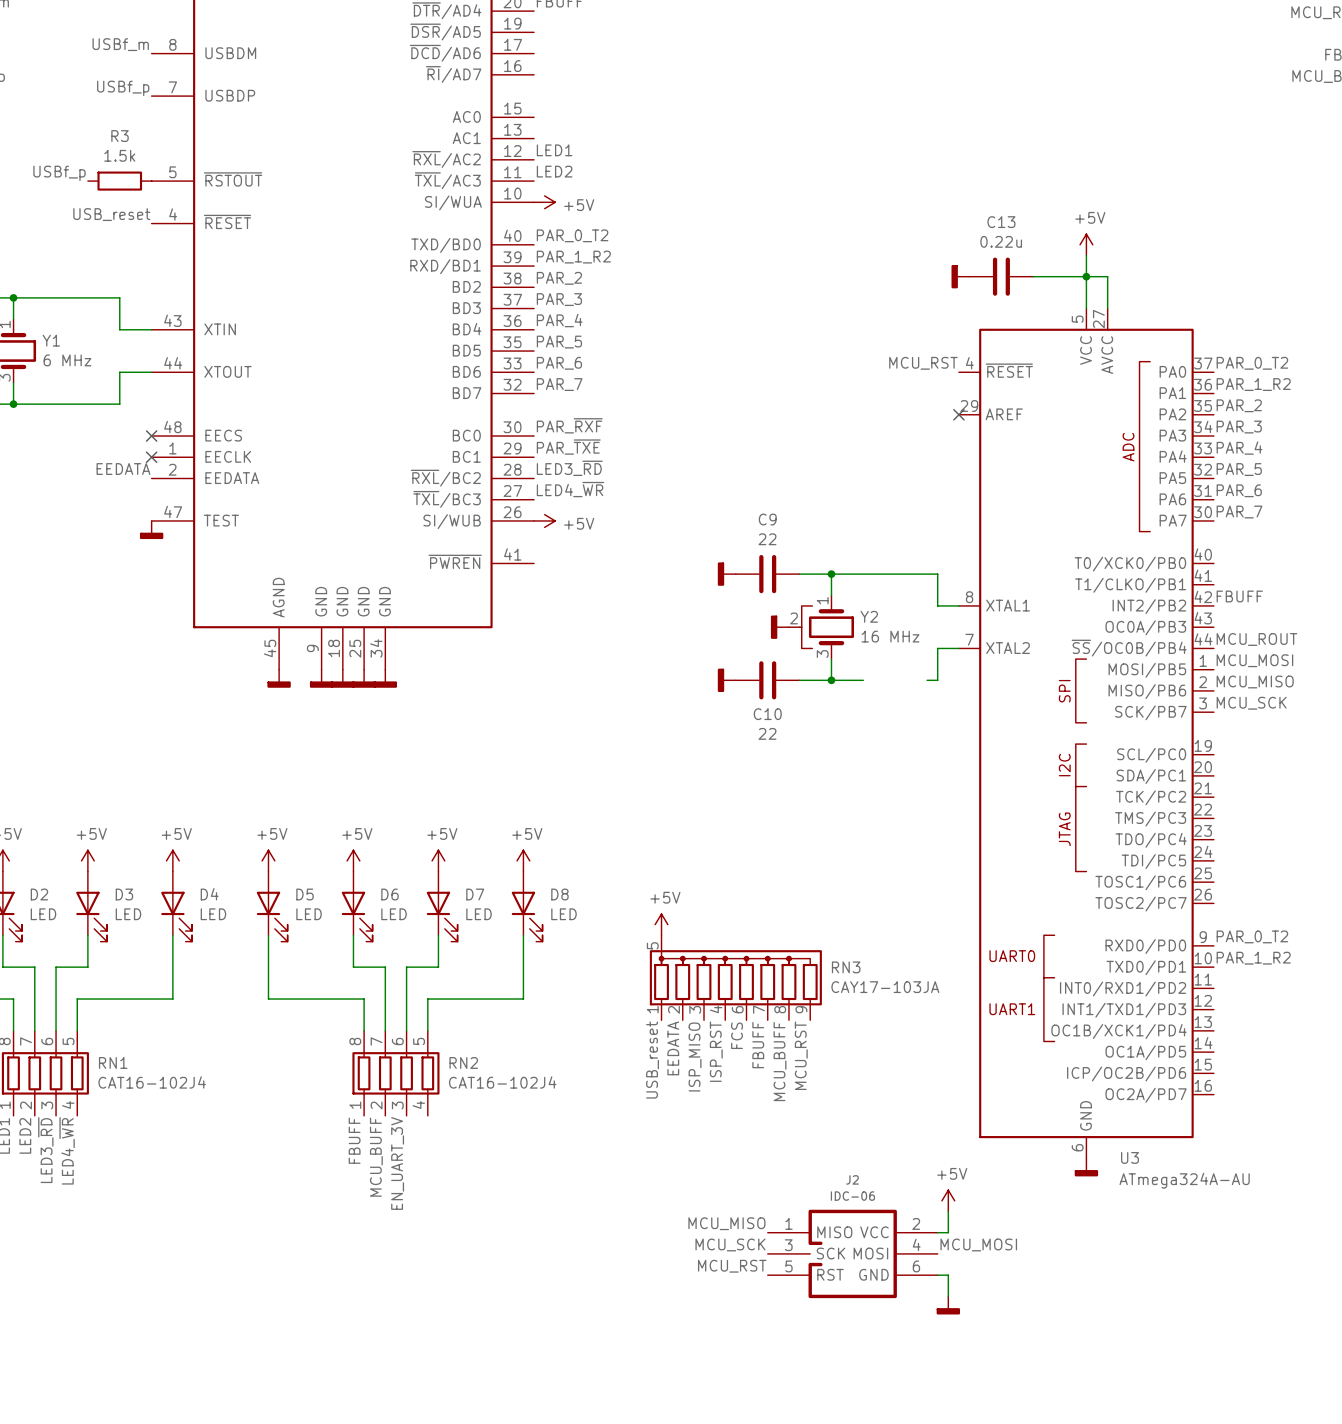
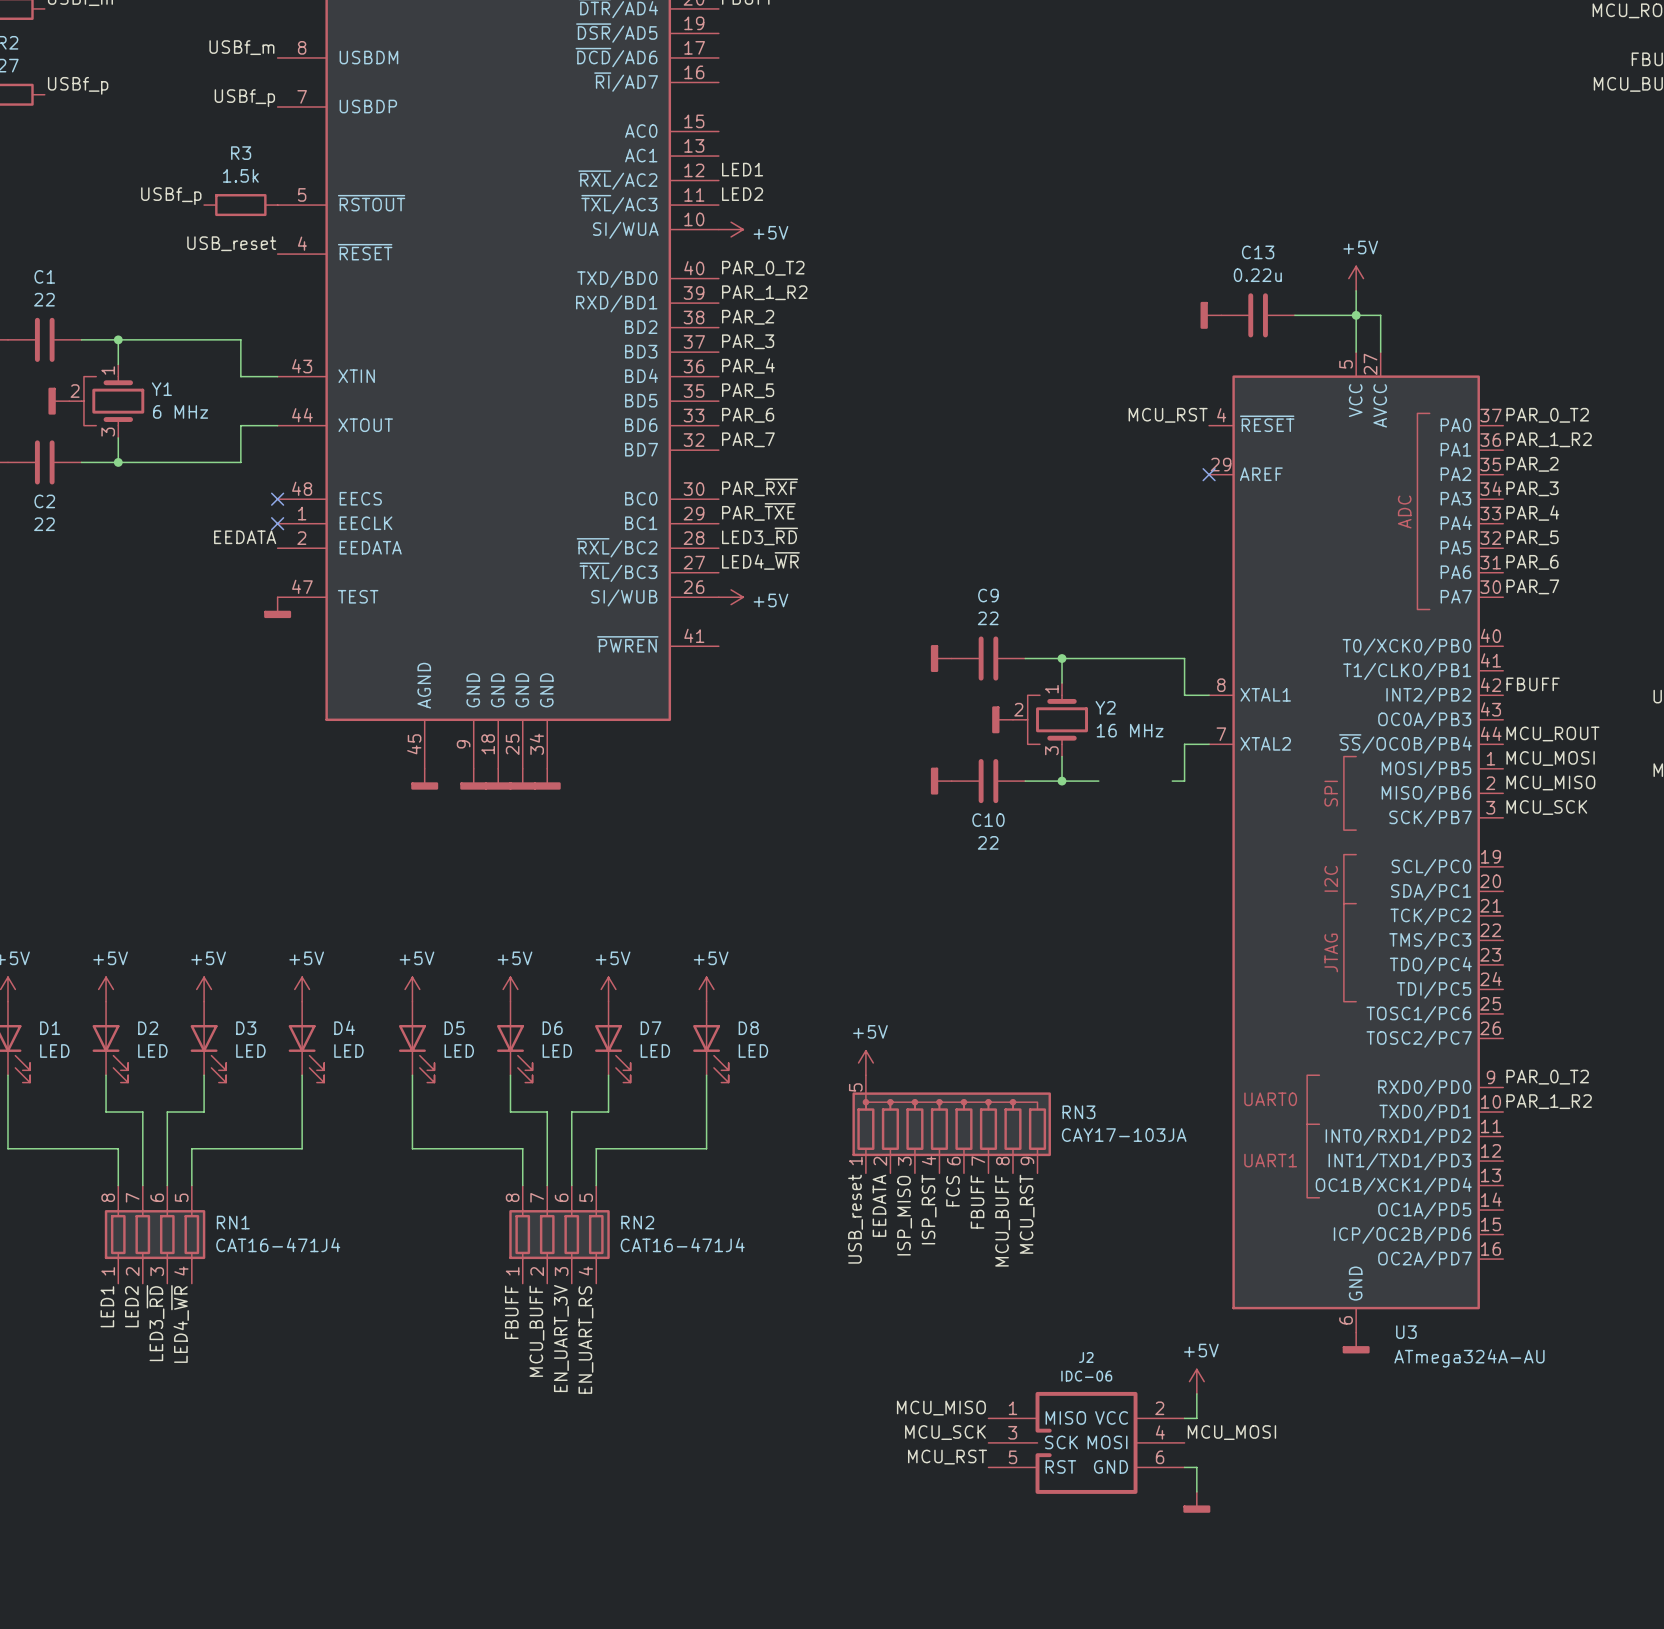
RN1 value: CAT16-102J4 (152, 1082) -> CAT16-471J4 (278, 1245)
RN2 value: CAT16-102J4 (502, 1082) -> CAT16-471J4 (682, 1245)
label: none -> EN_UART_RS (585, 1339)

